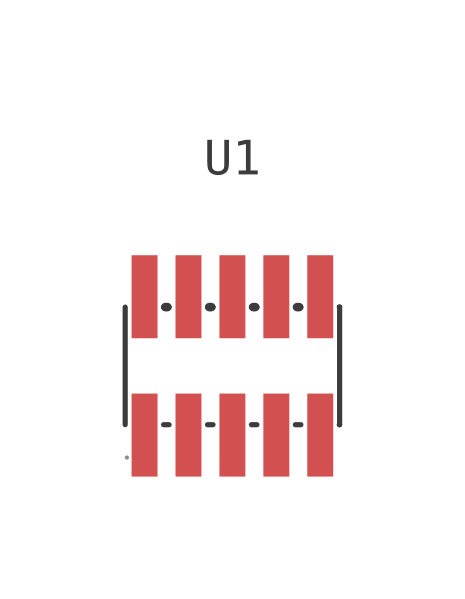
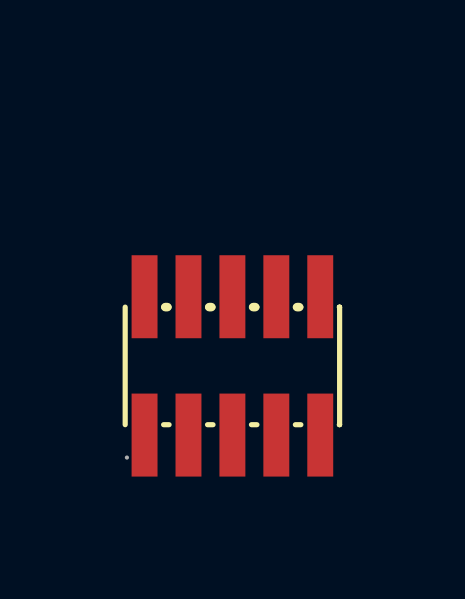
U1 name: U1 (232, 157) -> none

